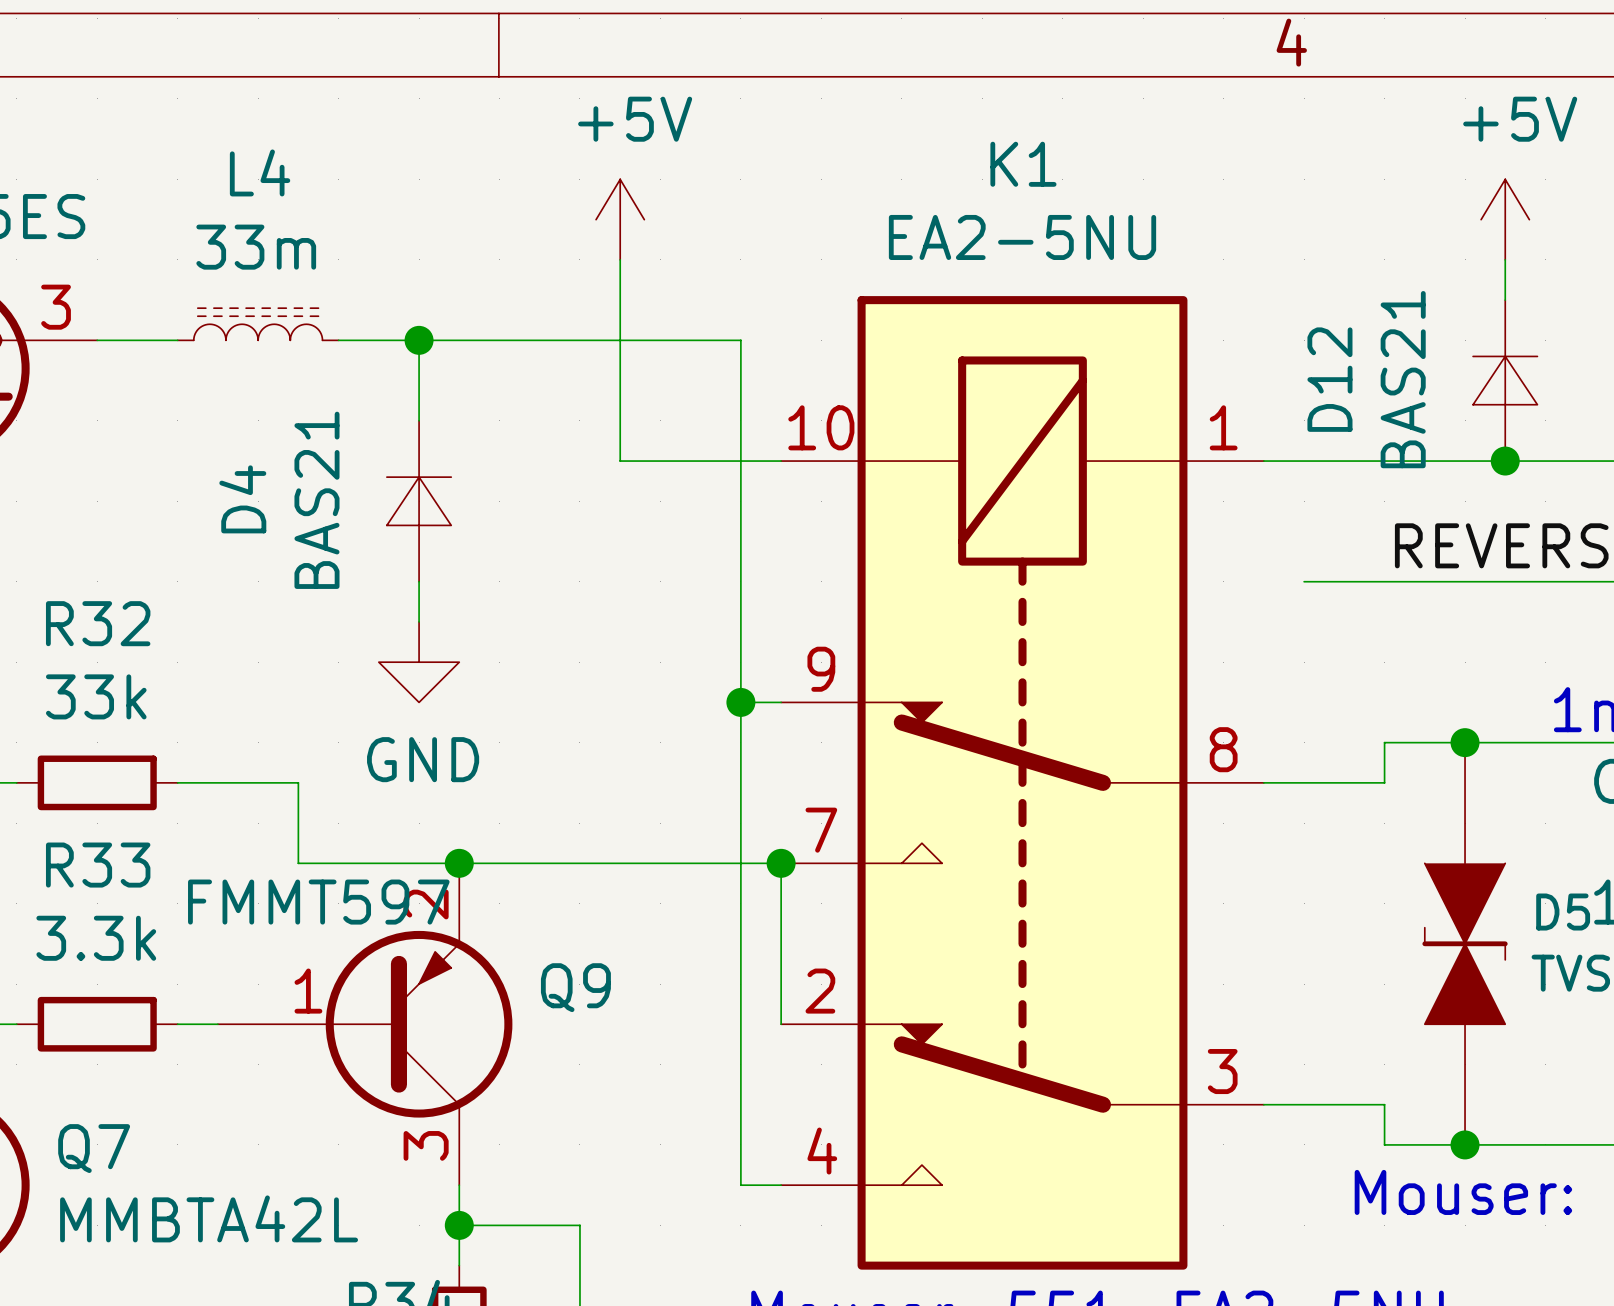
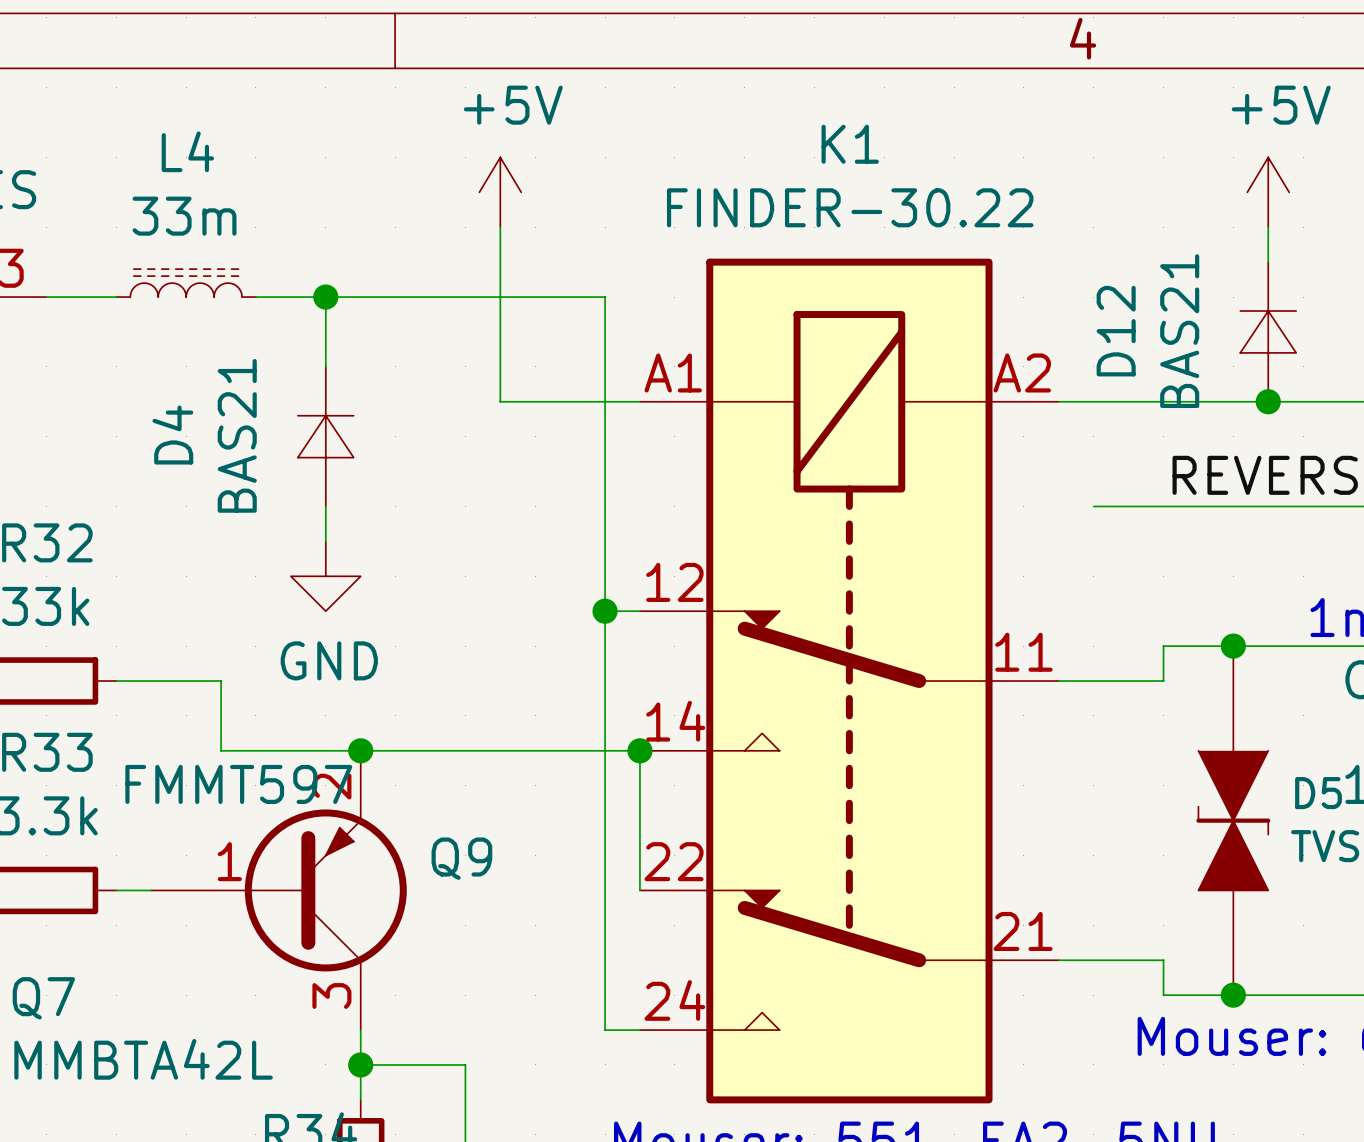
K1 value: EA2-5NU (1022, 237) -> FINDER-30.22 (850, 207)
K1 pin number: 10 (821, 427) -> A1 (673, 372)
K1 pin number: 1 (1223, 427) -> A2 (1022, 372)
K1 pin number: 9 (821, 669) -> 12 (674, 582)
K1 pin number: 8 (1223, 749) -> 11 (1023, 652)
K1 pin number: 7 (821, 830) -> 14 (675, 721)
K1 pin number: 2 (820, 991) -> 22 (674, 861)
K1 pin number: 3 (1222, 1071) -> 21 (1023, 931)
K1 pin number: 4 (822, 1151) -> 24 (674, 1000)

